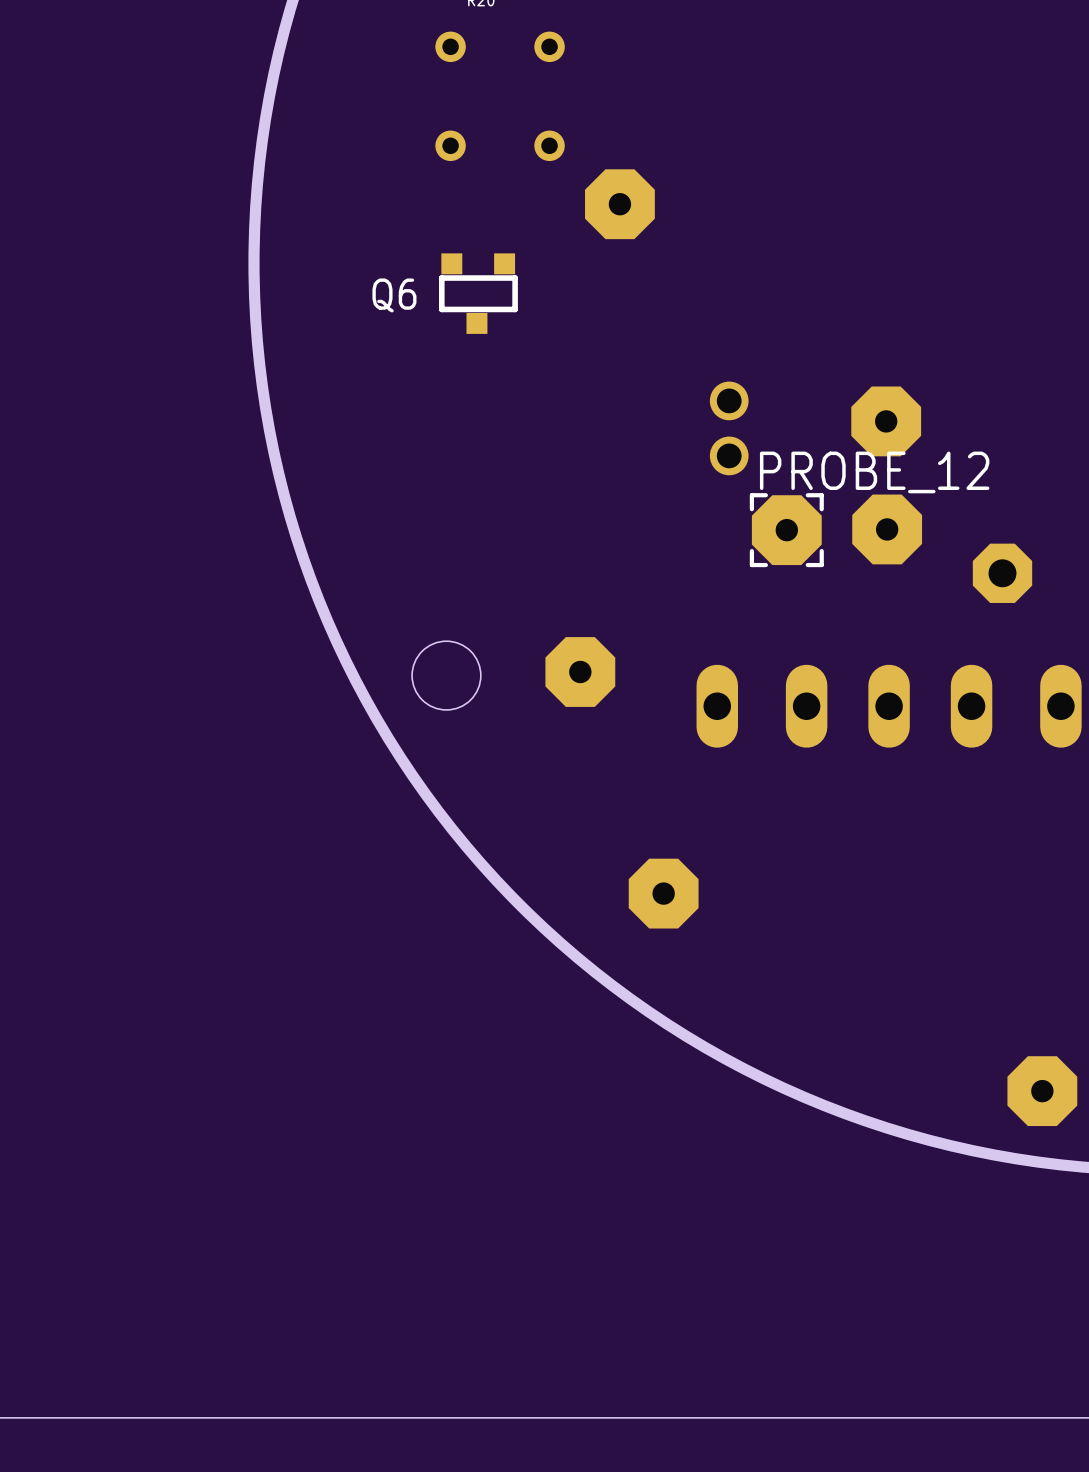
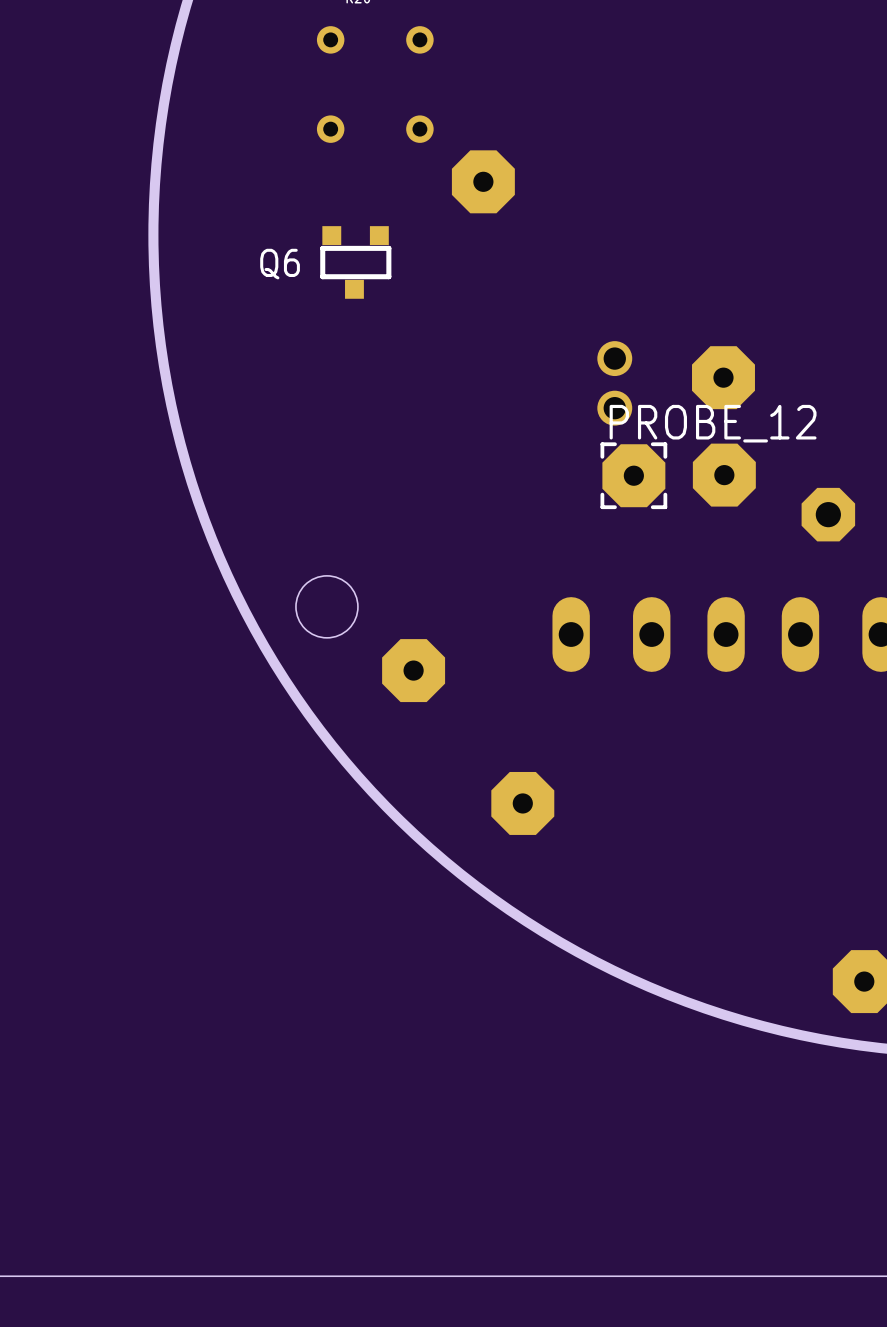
part position: (729, 428) -> (614, 383)
part position: (580, 672) -> (413, 670)

